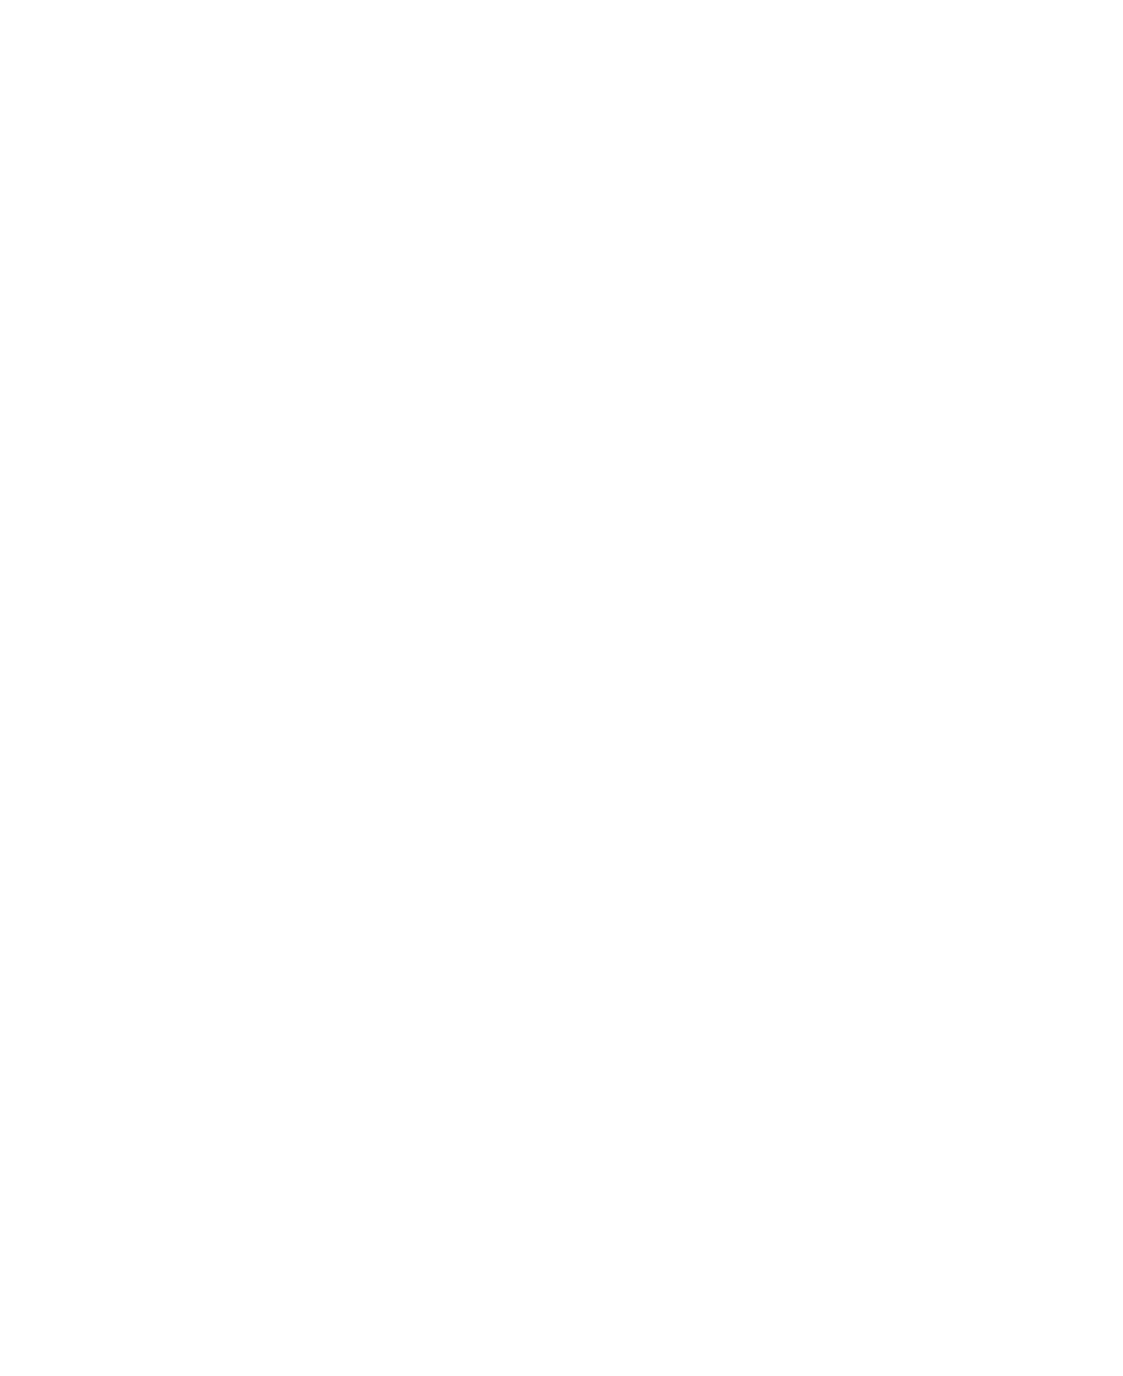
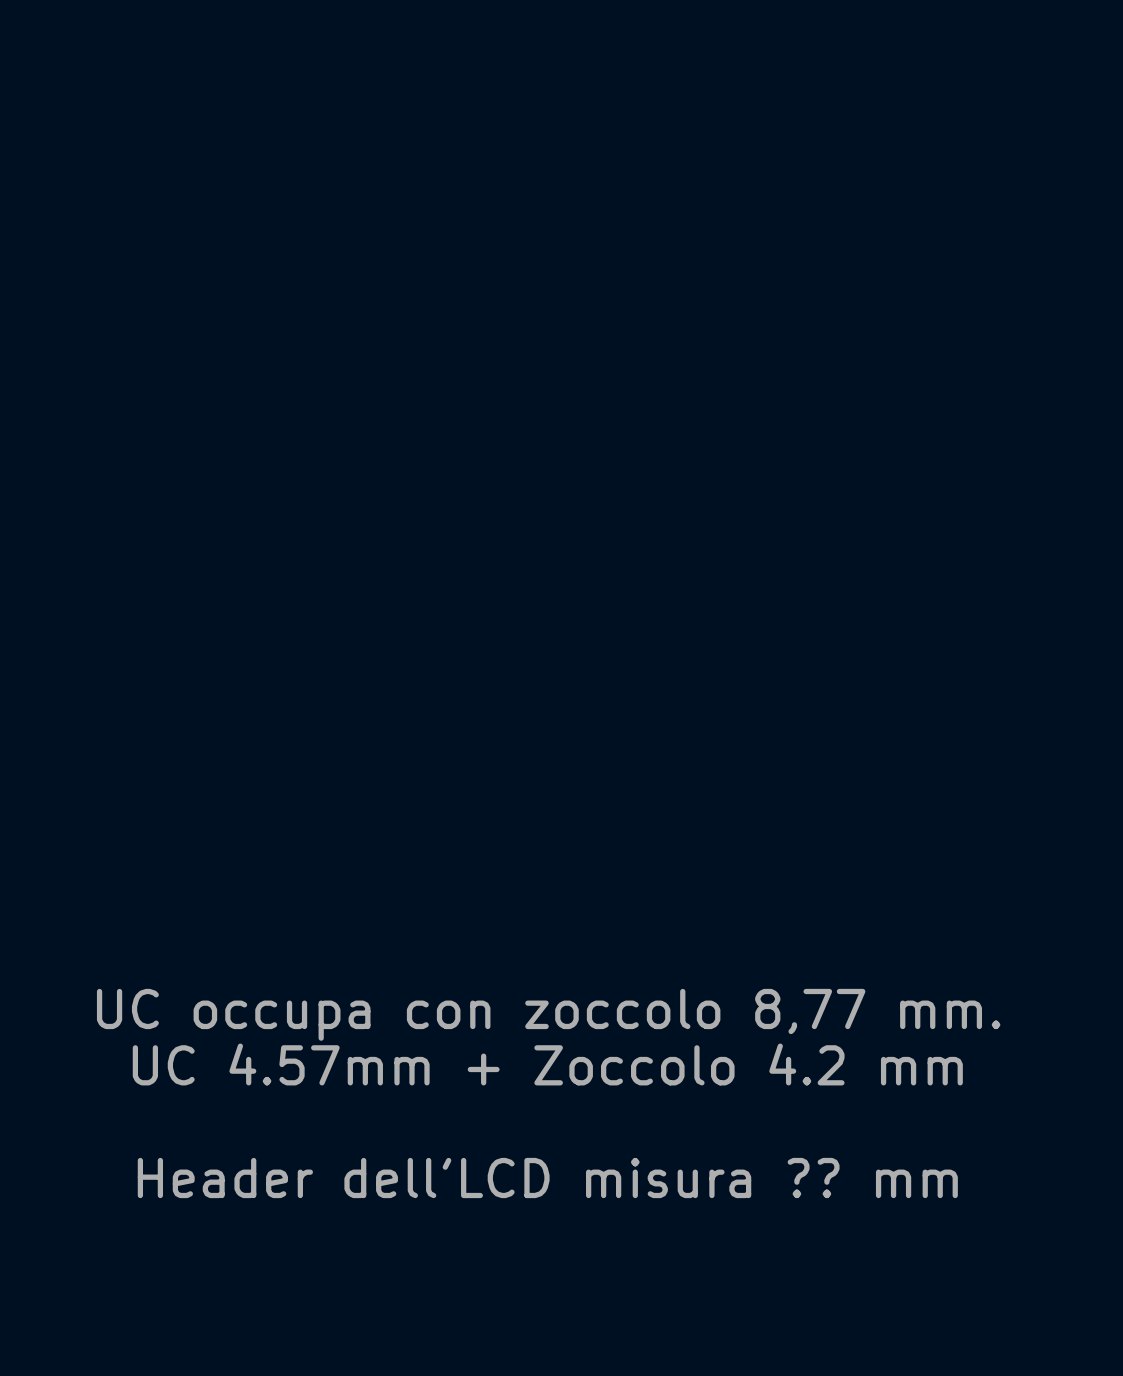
text: none -> UC occupa con zoccolo 8,77 mm. (548, 1014)
text: none -> UC 4.57mm + Zoccolo 4.2 mm (547, 1064)
text: none -> Header dell'LCD misura ?? mm (547, 1178)

